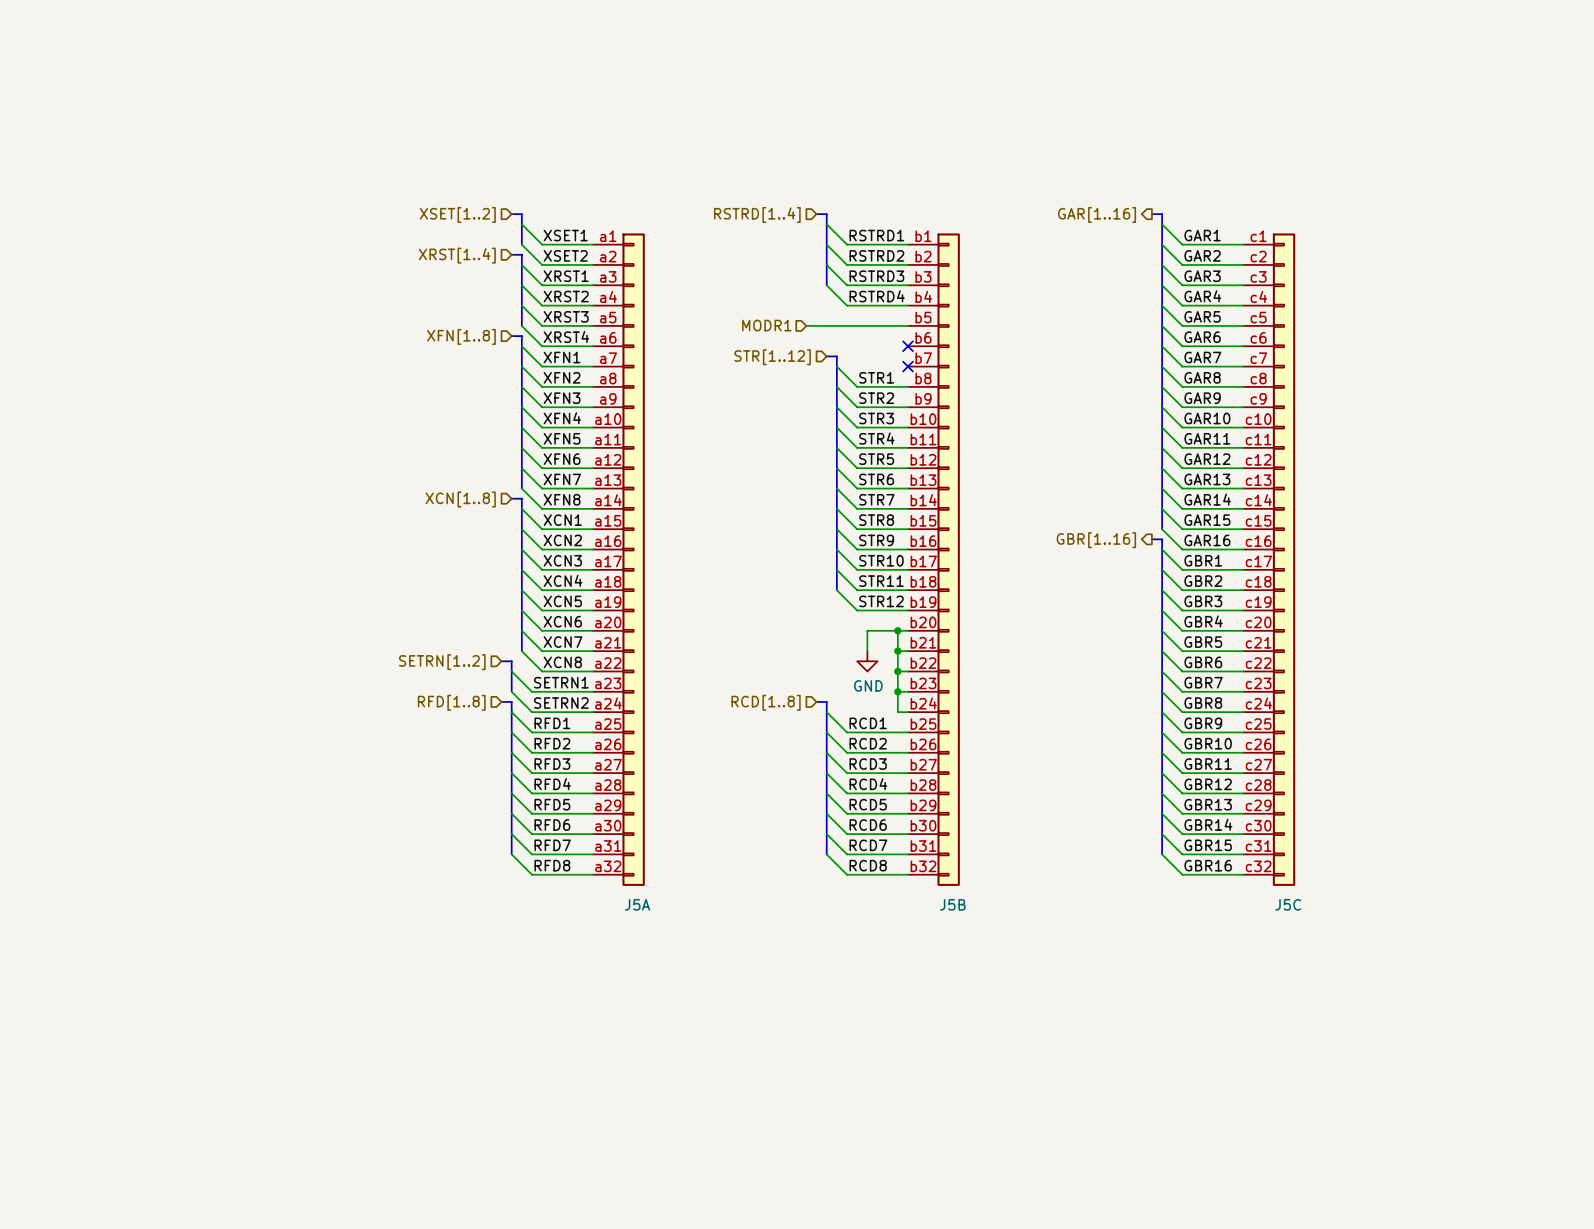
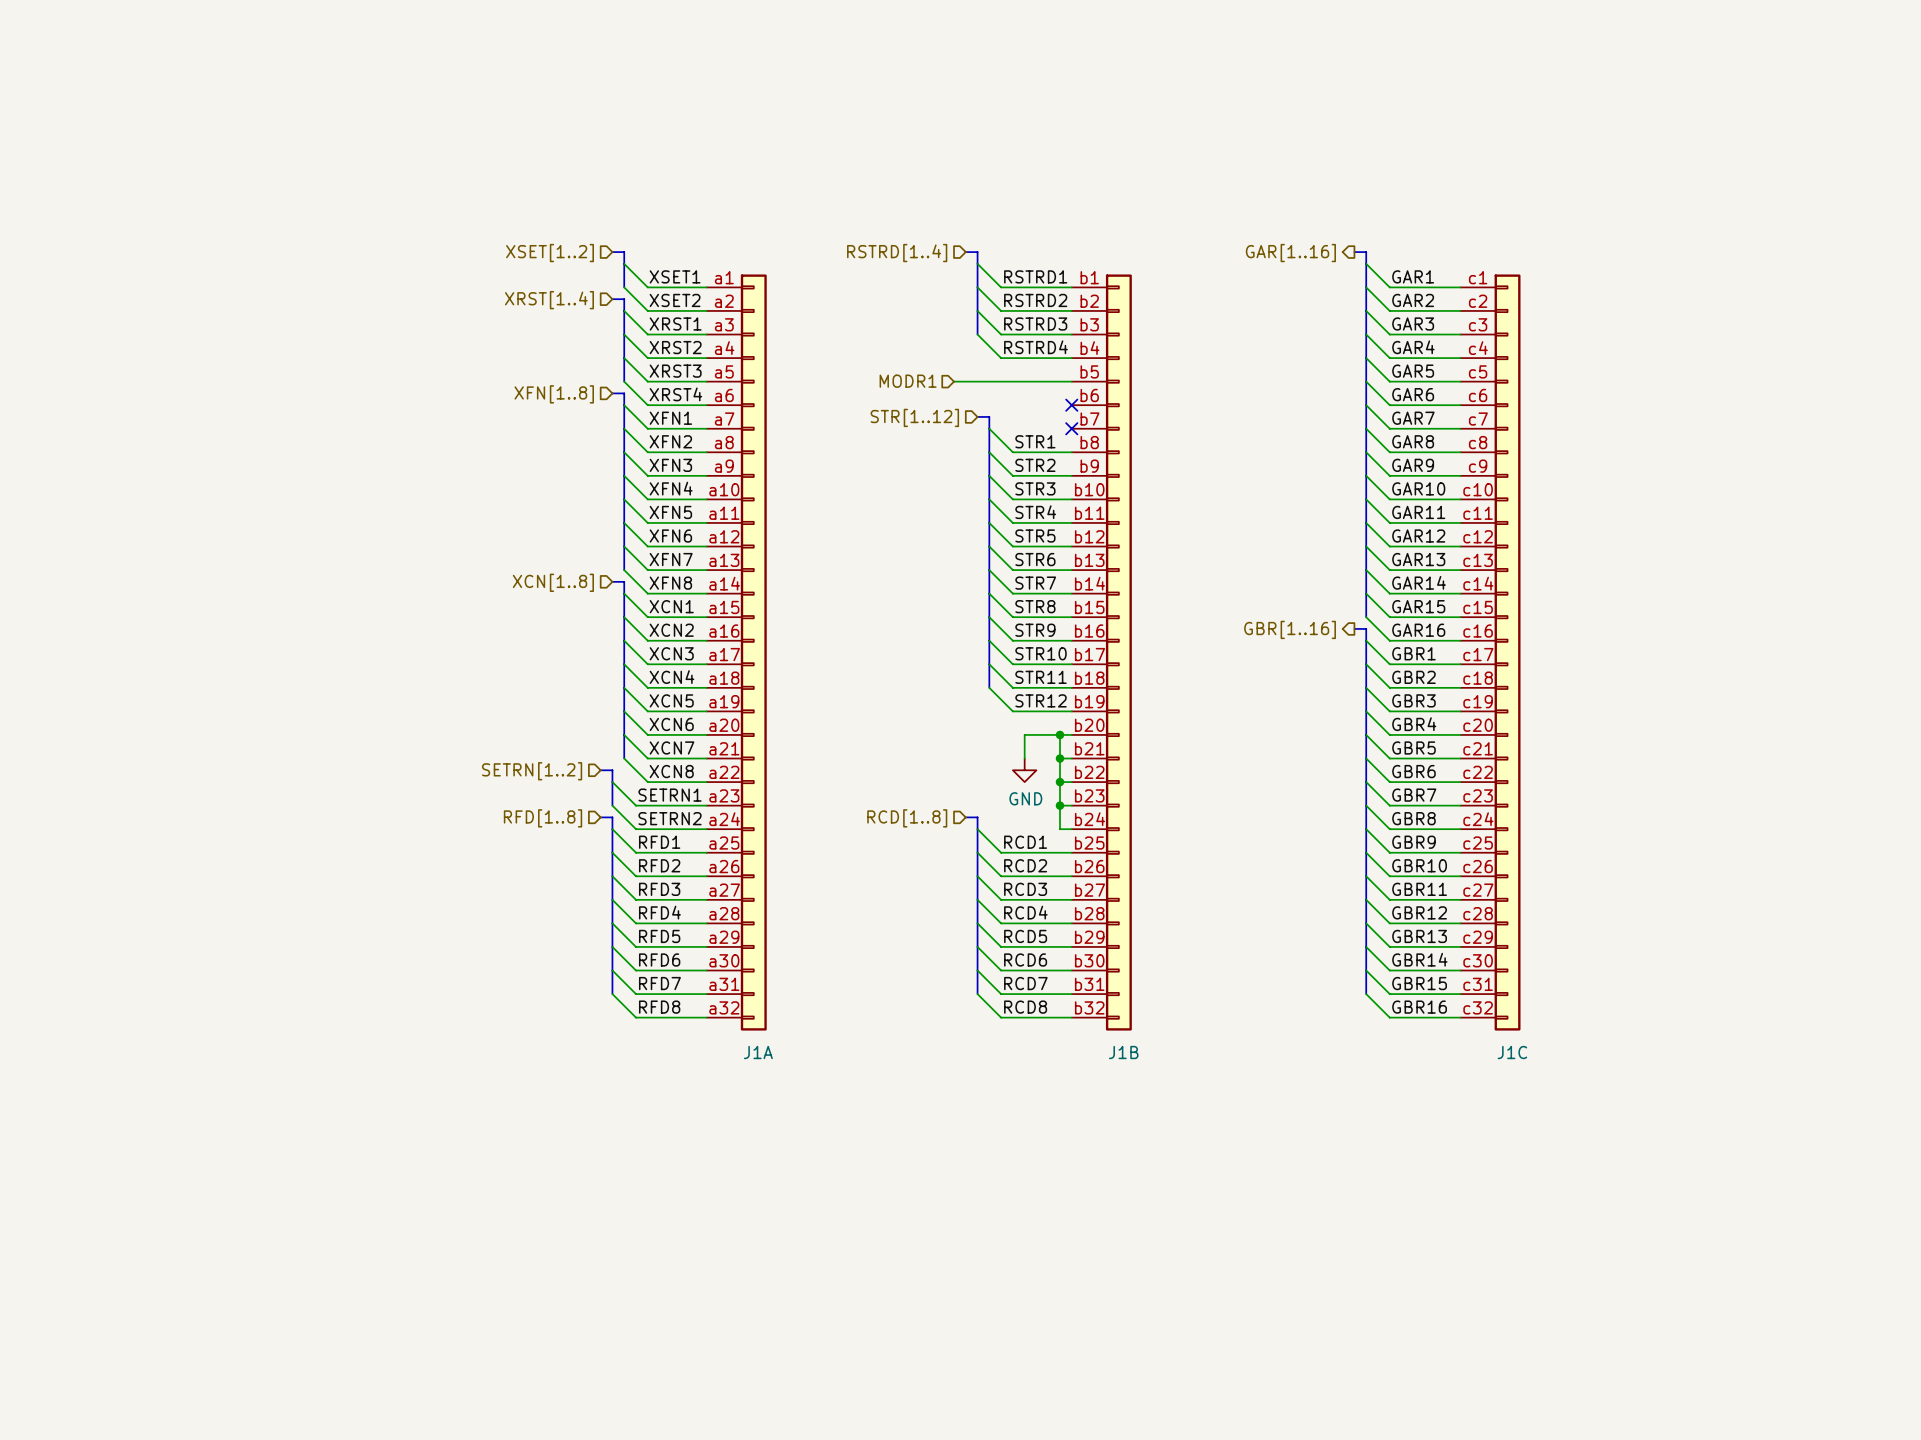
J5A name: J5A (637, 904) -> J1A (758, 1052)
J5B name: J5B (952, 904) -> J1B (1123, 1052)
J5C name: J5C (1288, 904) -> J1C (1512, 1052)

